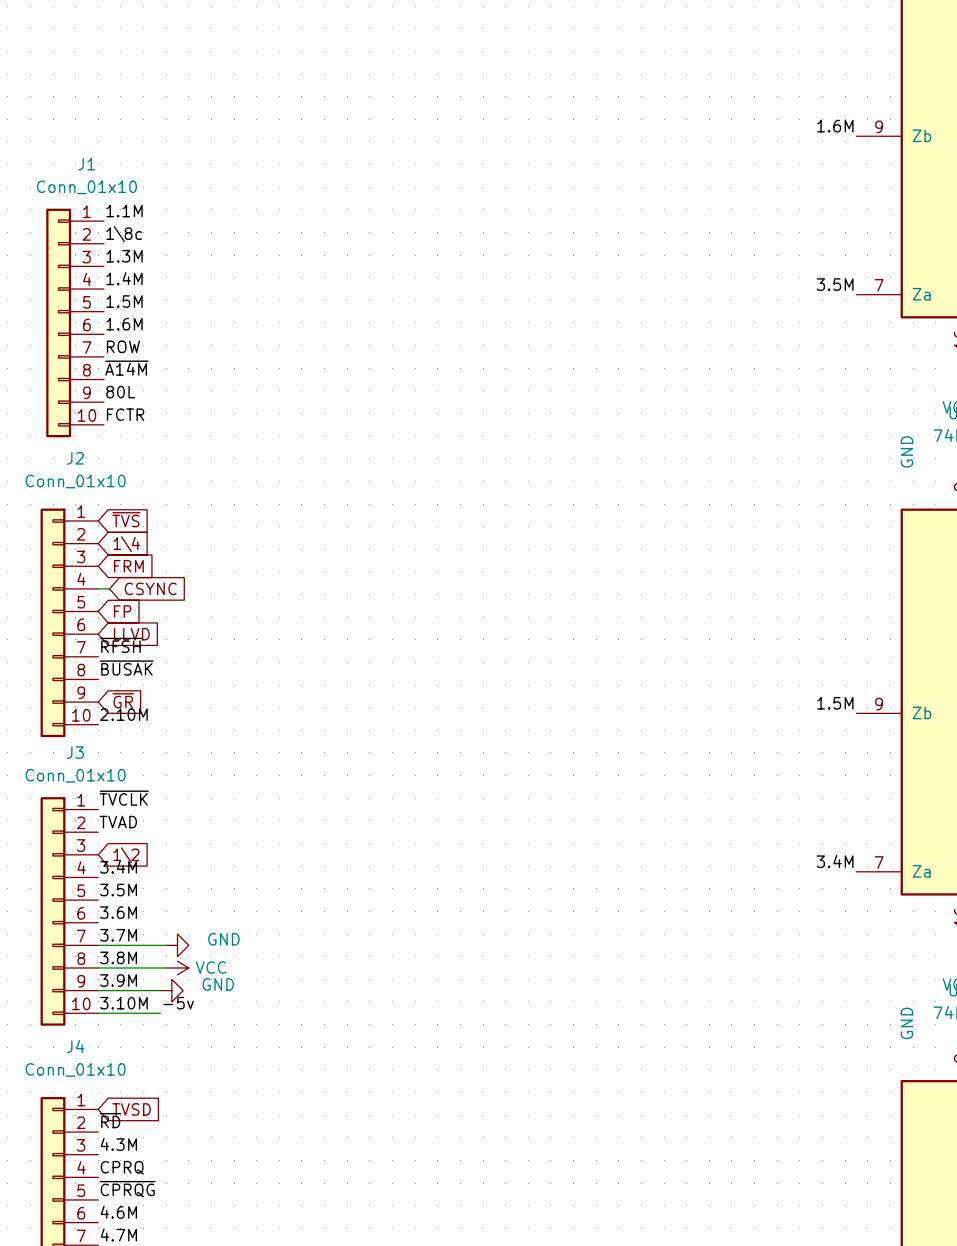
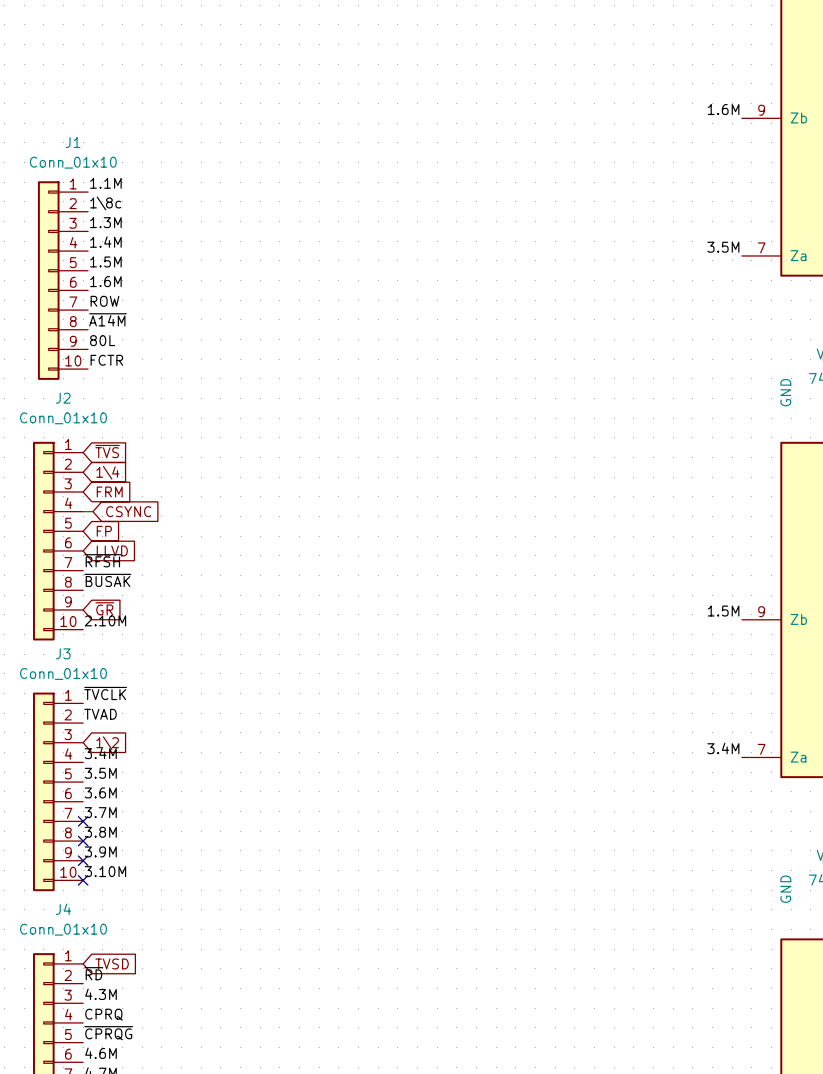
wire: (98, 945) (166, 945) -> none
no-connect mark: none -> (83, 821)
power symbol: GND (177, 945) -> none
wire: (98, 967) (166, 967) -> none
no-connect mark: none -> (83, 841)
power symbol: VCC (177, 967) -> none
wire: (98, 990) (160, 990) -> none
no-connect mark: none -> (83, 860)
power symbol: GND (171, 990) -> none
label: -5v (178, 1003) -> none
wire: (98, 1013) (160, 1013) -> none
no-connect mark: none -> (83, 880)

